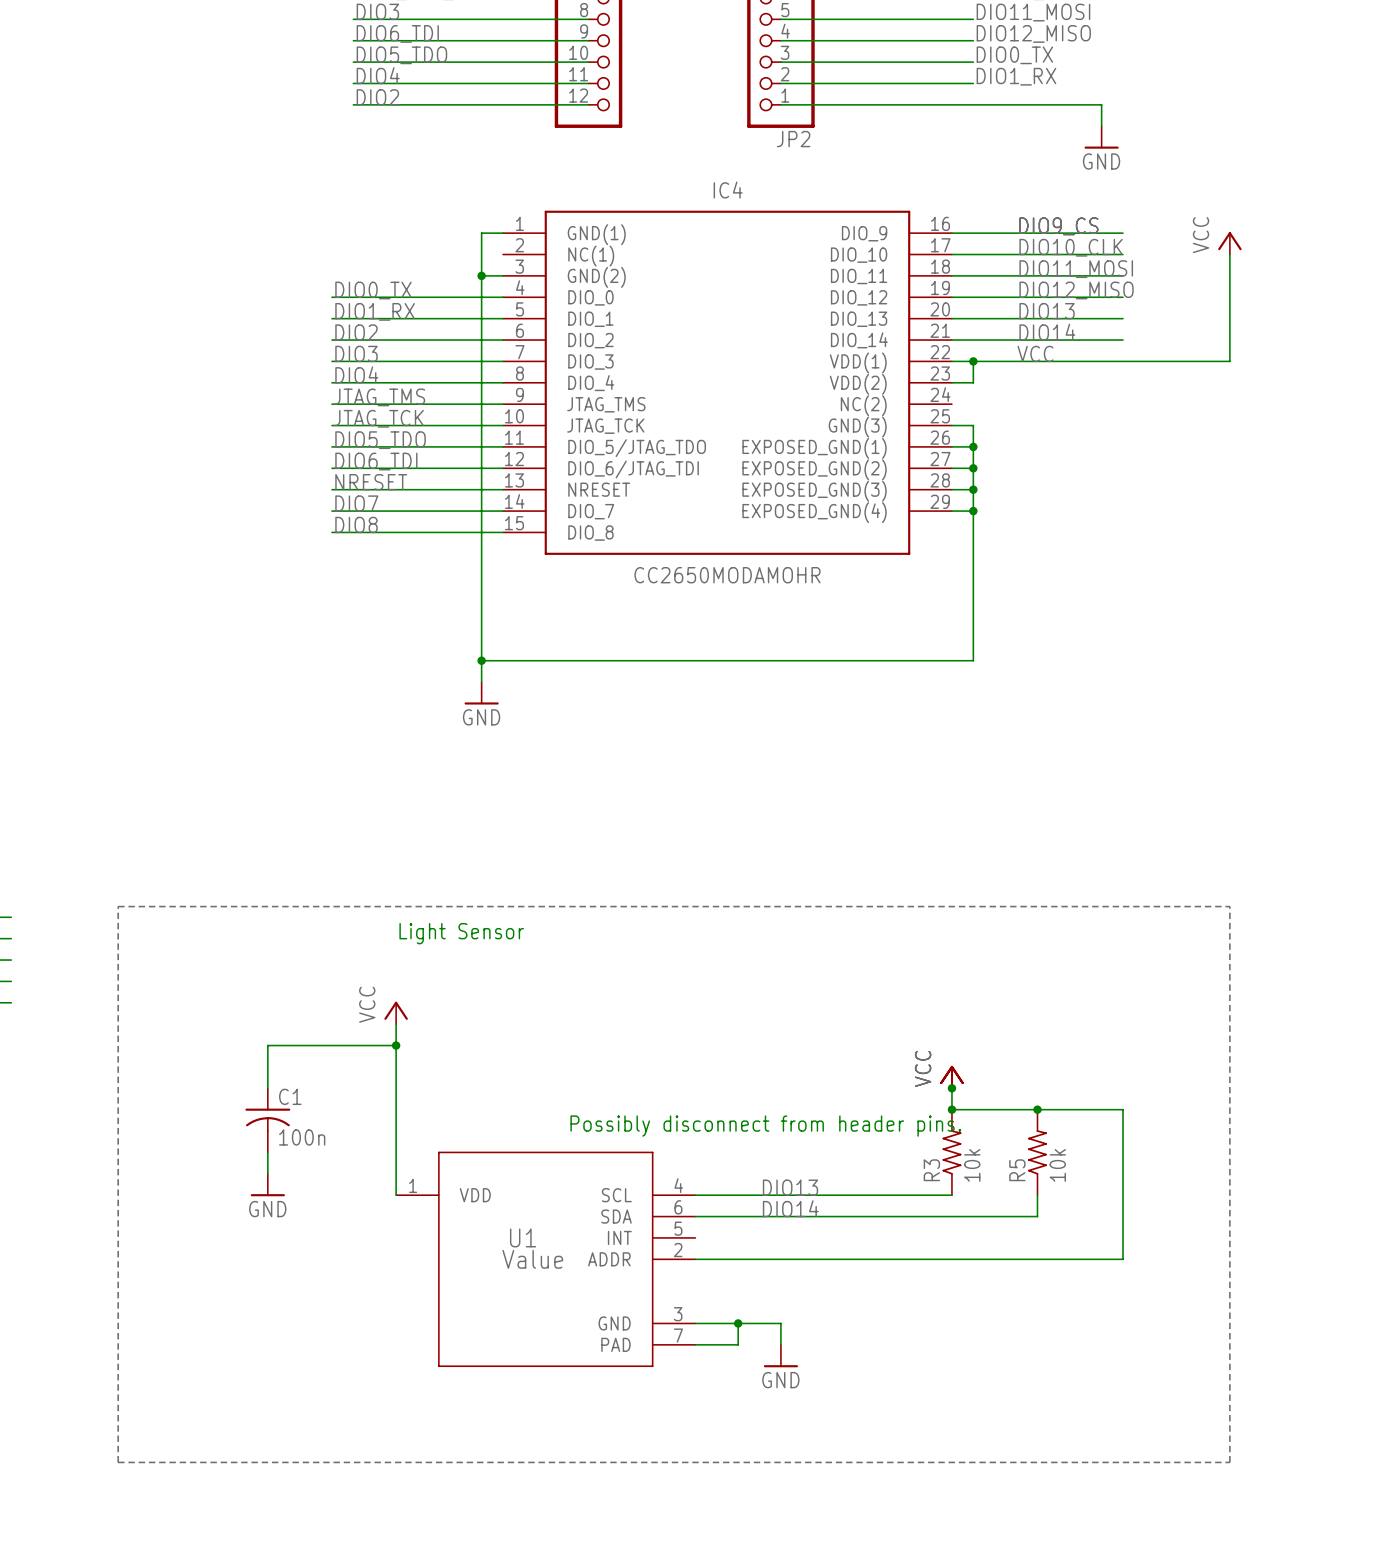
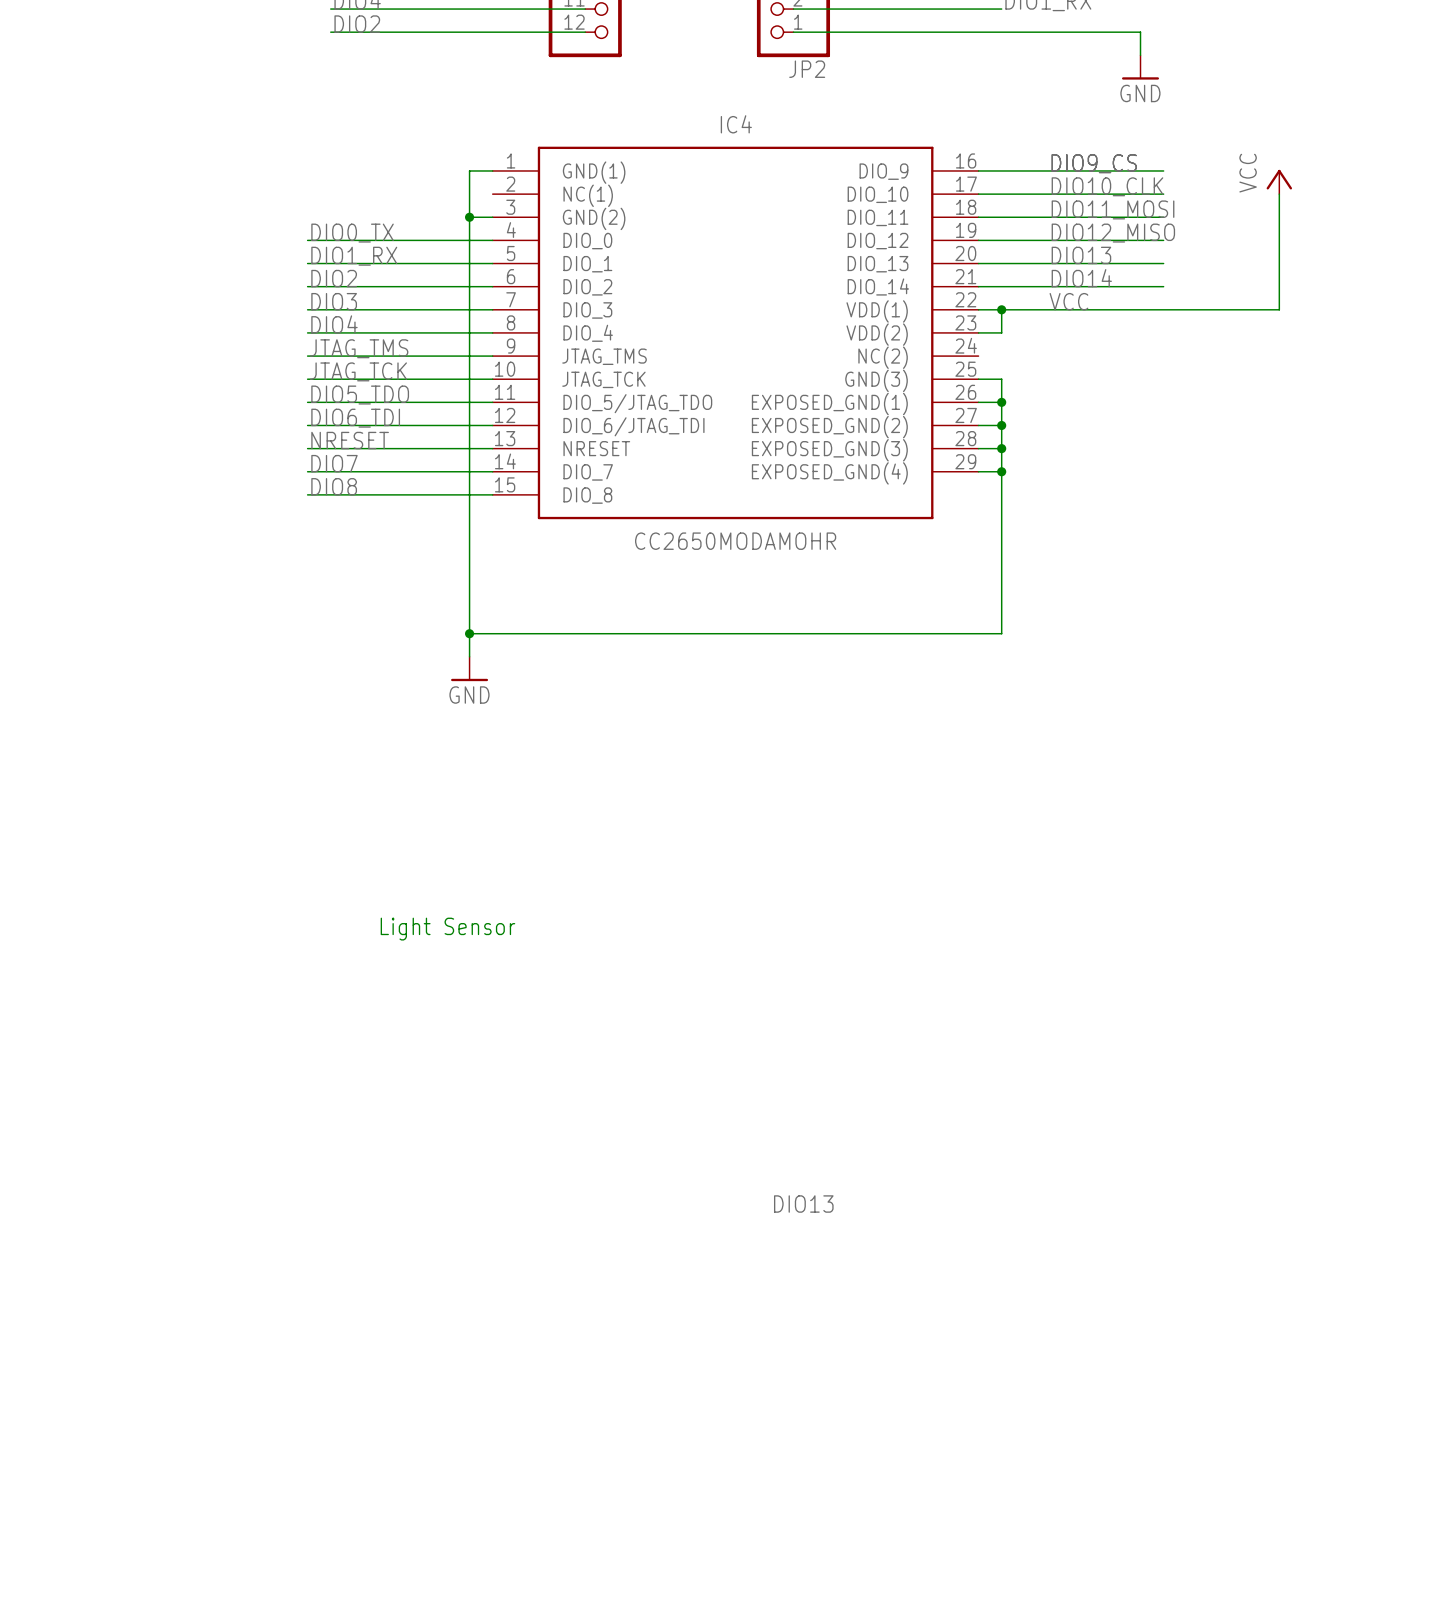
line: (118, 906) (1229, 906) (1229, 1462) (118, 1462) (118, 906) -> none
power symbol: VCC (396, 1012) -> none
wire: (396, 1024) (396, 1195) -> none
wire: (396, 1045) (267, 1045) (267, 1088) -> none
junction: (396, 1045) -> none
power symbol: VCC (951, 1077) -> none
wire: (951, 1088) (951, 1109) (1123, 1109) (1123, 1259) (695, 1259) -> none
junction: (951, 1088) -> none
junction: (951, 1109) -> none
junction: (1037, 1109) -> none
C1: 100n (267, 1120) -> none
text: Possibly disconnect from header pins. (765, 1126) -> none
wire: (267, 1152) (267, 1173) -> none
R3: 10k (951, 1152) -> none
R5: 10k (1037, 1152) -> none
power symbol: GND (267, 1185) -> none
wire: (695, 1195) (951, 1195) -> none
wire: (1037, 1195) (1037, 1216) (695, 1216) -> none
label: DIO14 (790, 1208) -> none
U1: Value (545, 1259) -> none
wire: (695, 1323) (780, 1323) (780, 1344) -> none
wire: (738, 1323) (738, 1344) (695, 1344) -> none
junction: (738, 1323) -> none
power symbol: GND (780, 1356) -> none

